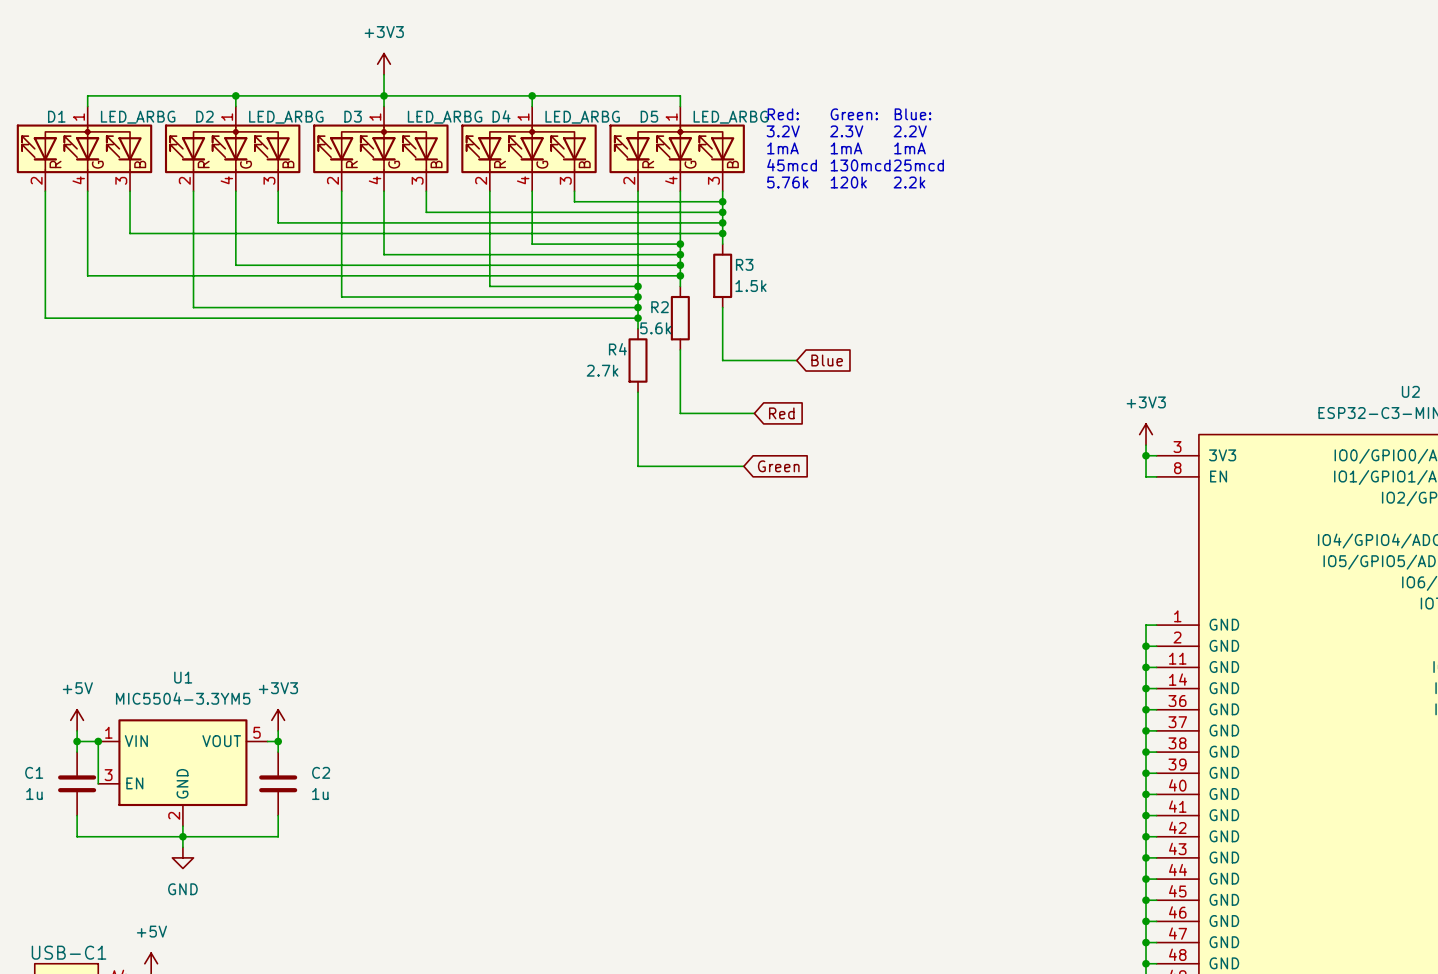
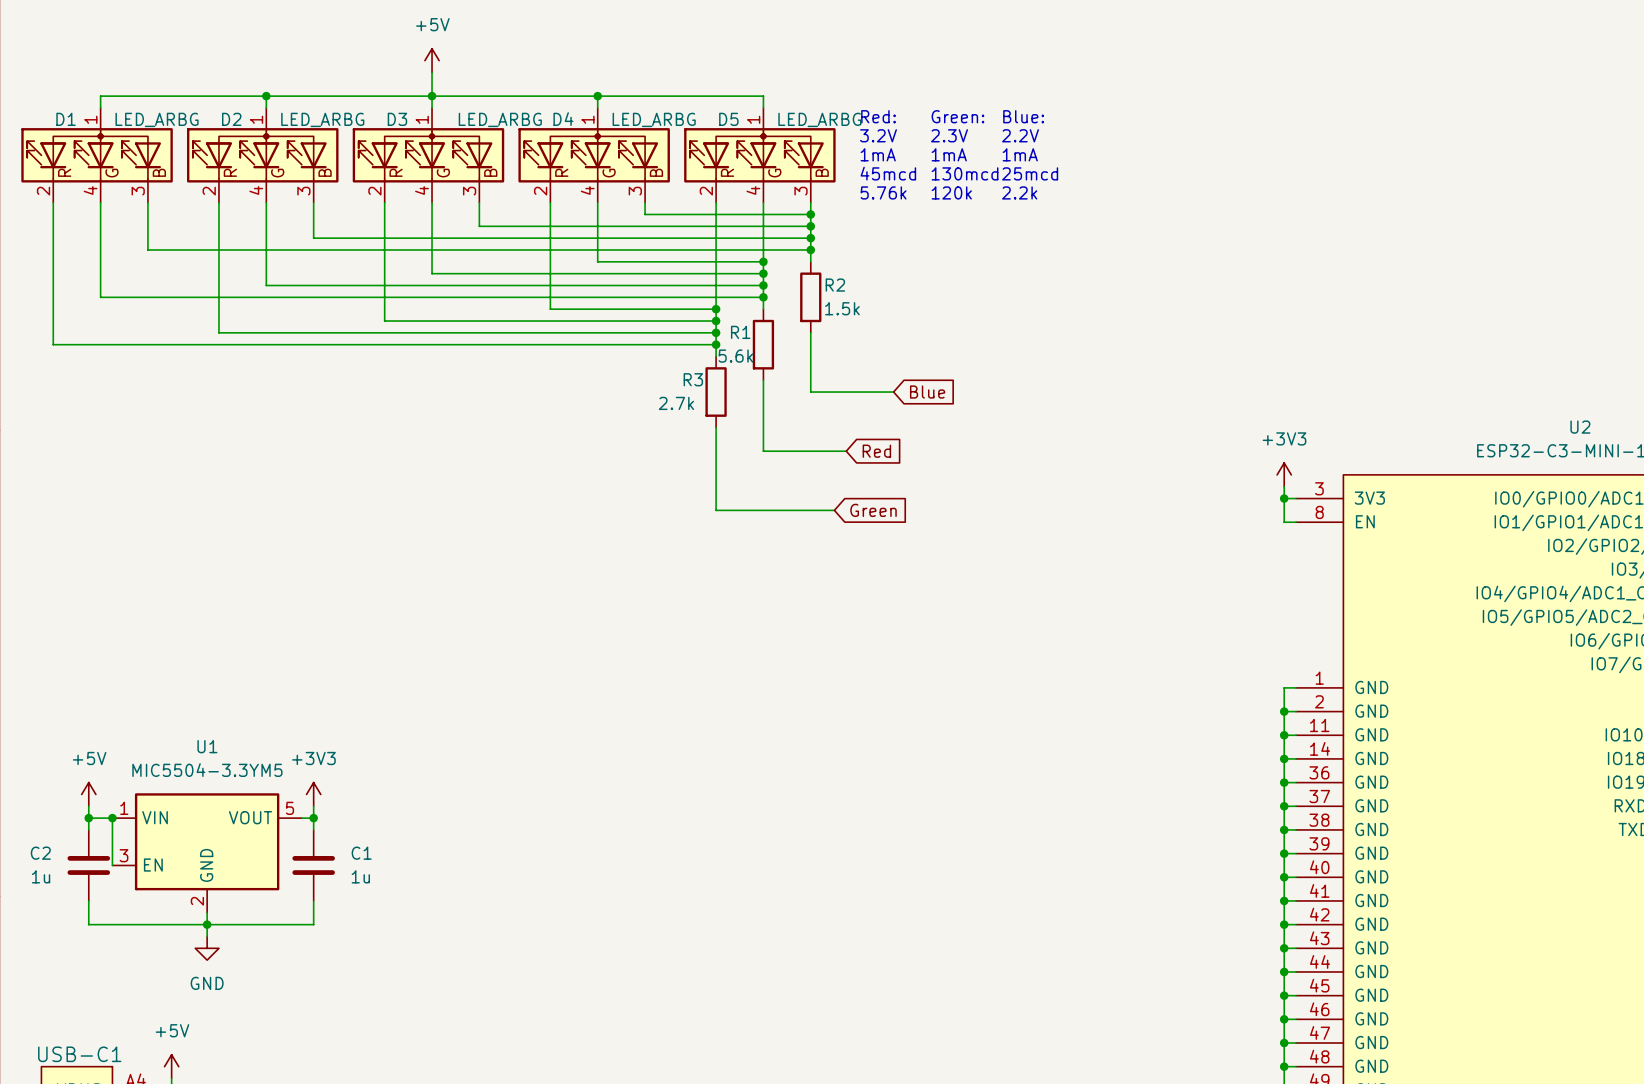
power symbol: +3V3 (384, 64) -> +5V (432, 60)
R3 name: R3 (744, 264) -> R2 (835, 285)
R2 name: R2 (660, 307) -> R1 (740, 332)
R4 name: R4 (617, 349) -> R3 (693, 379)
C1 name: C1 (34, 772) -> C2 (40, 853)
C2 name: C2 (321, 772) -> C1 (361, 853)

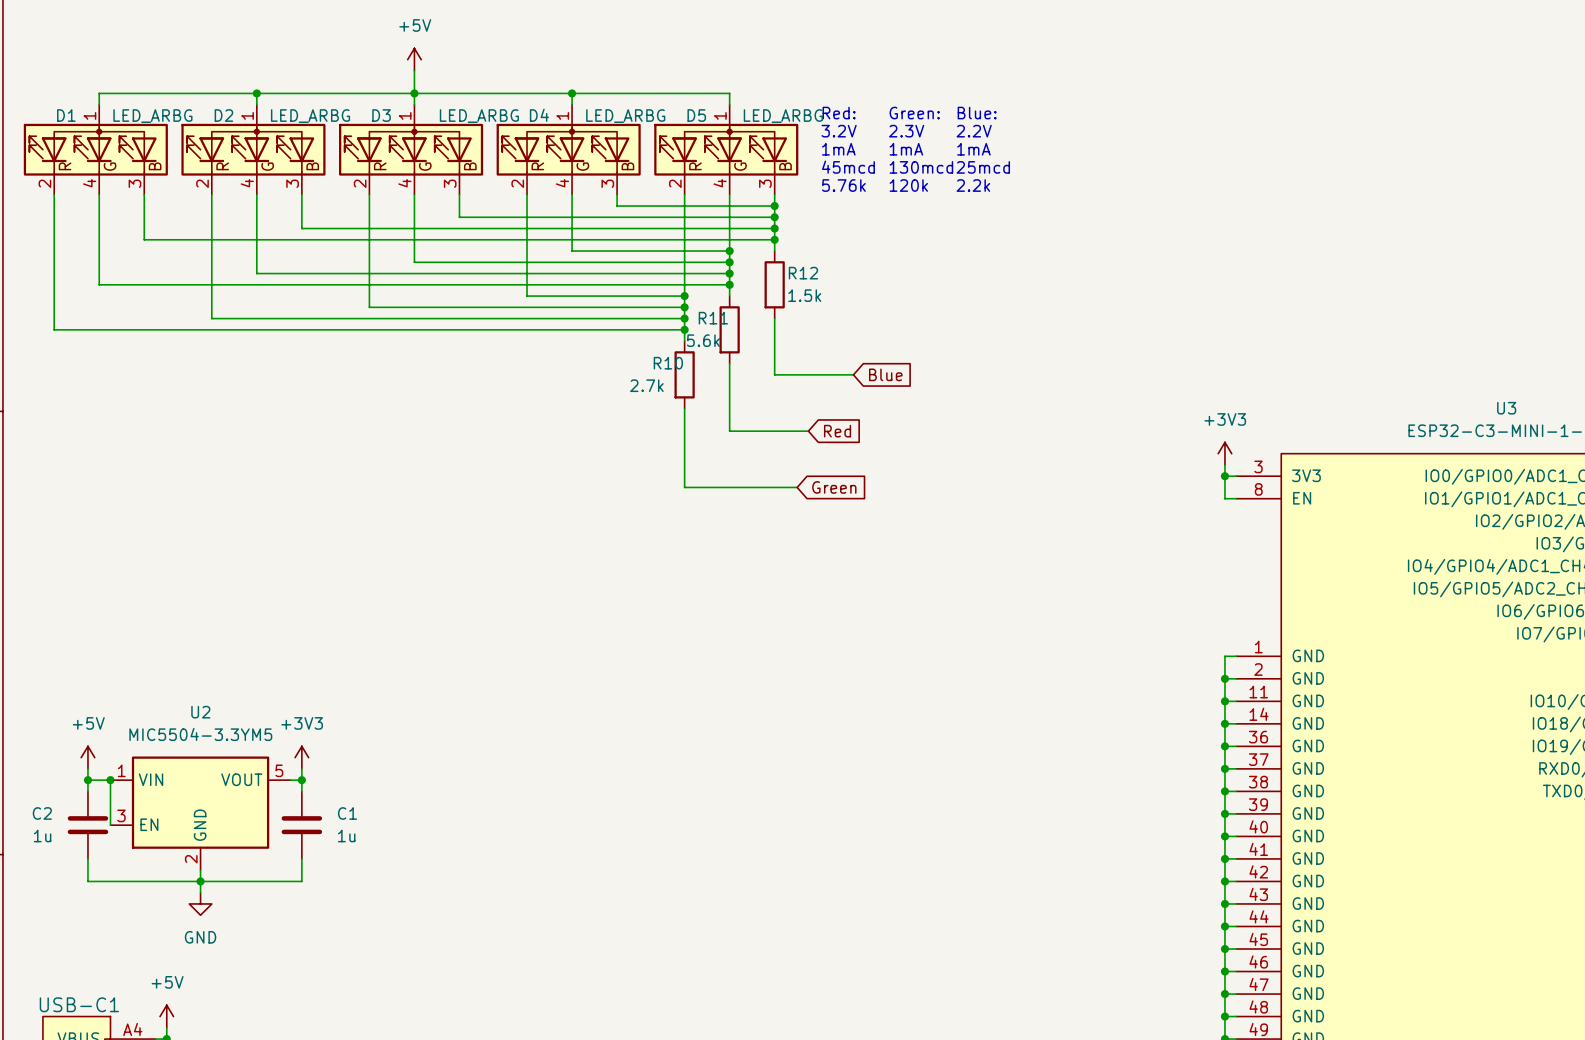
R2 name: R2 (835, 285) -> R12 (803, 273)
R1 name: R1 (740, 332) -> R11 (713, 318)
R3 name: R3 (693, 379) -> R10 (668, 363)
U2 name: U2 (1580, 427) -> U3 (1506, 408)
U1 name: U1 (207, 746) -> U2 (200, 712)

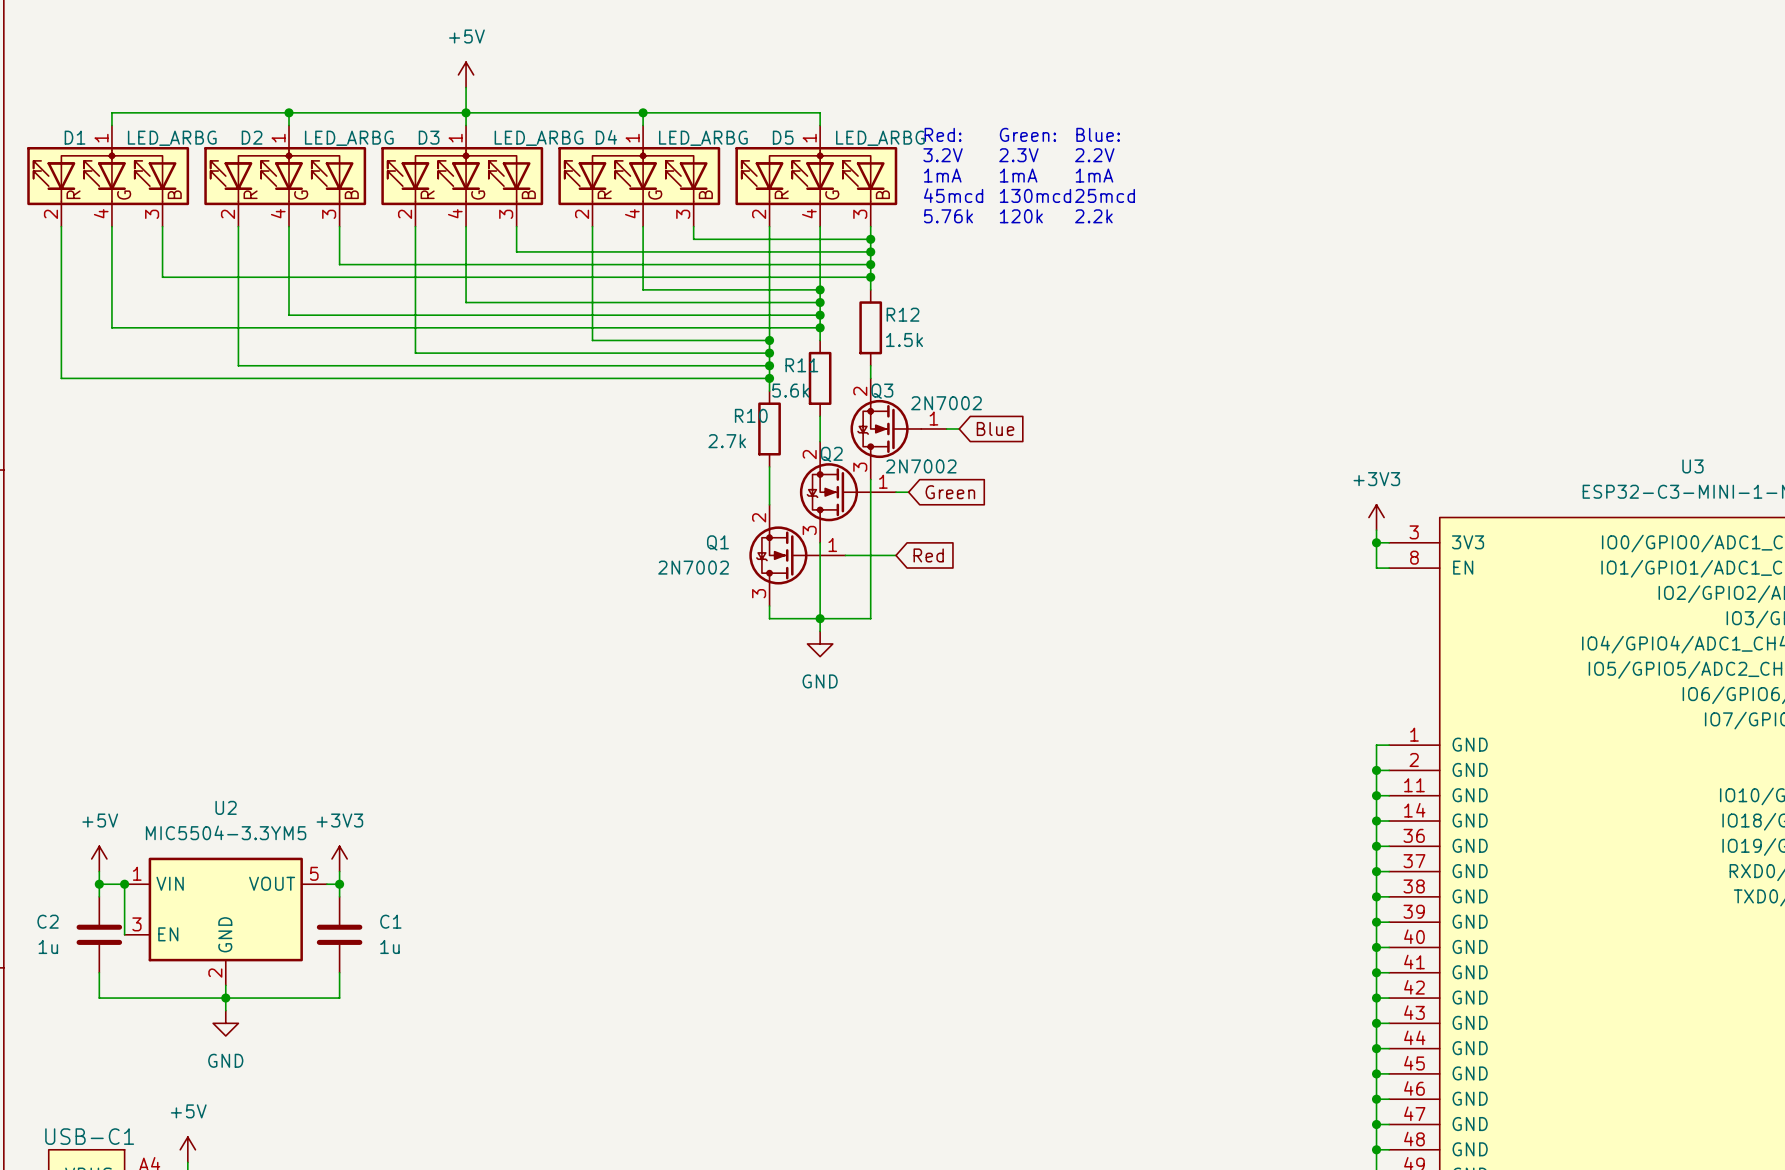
Q3: none -> 2N7002 (898, 428)
wire: none -> (870, 479) (870, 618) (769, 618) (769, 606)
Q2: none -> 2N7002 (847, 492)
global label: Red (837, 431) -> Green (950, 492)
wire: none -> (820, 542) (820, 631)
Q1: none -> 2N7002 (797, 555)
global label: Green (834, 487) -> Red (928, 555)
junction: none -> (820, 618)
power symbol: none -> GND (820, 643)

